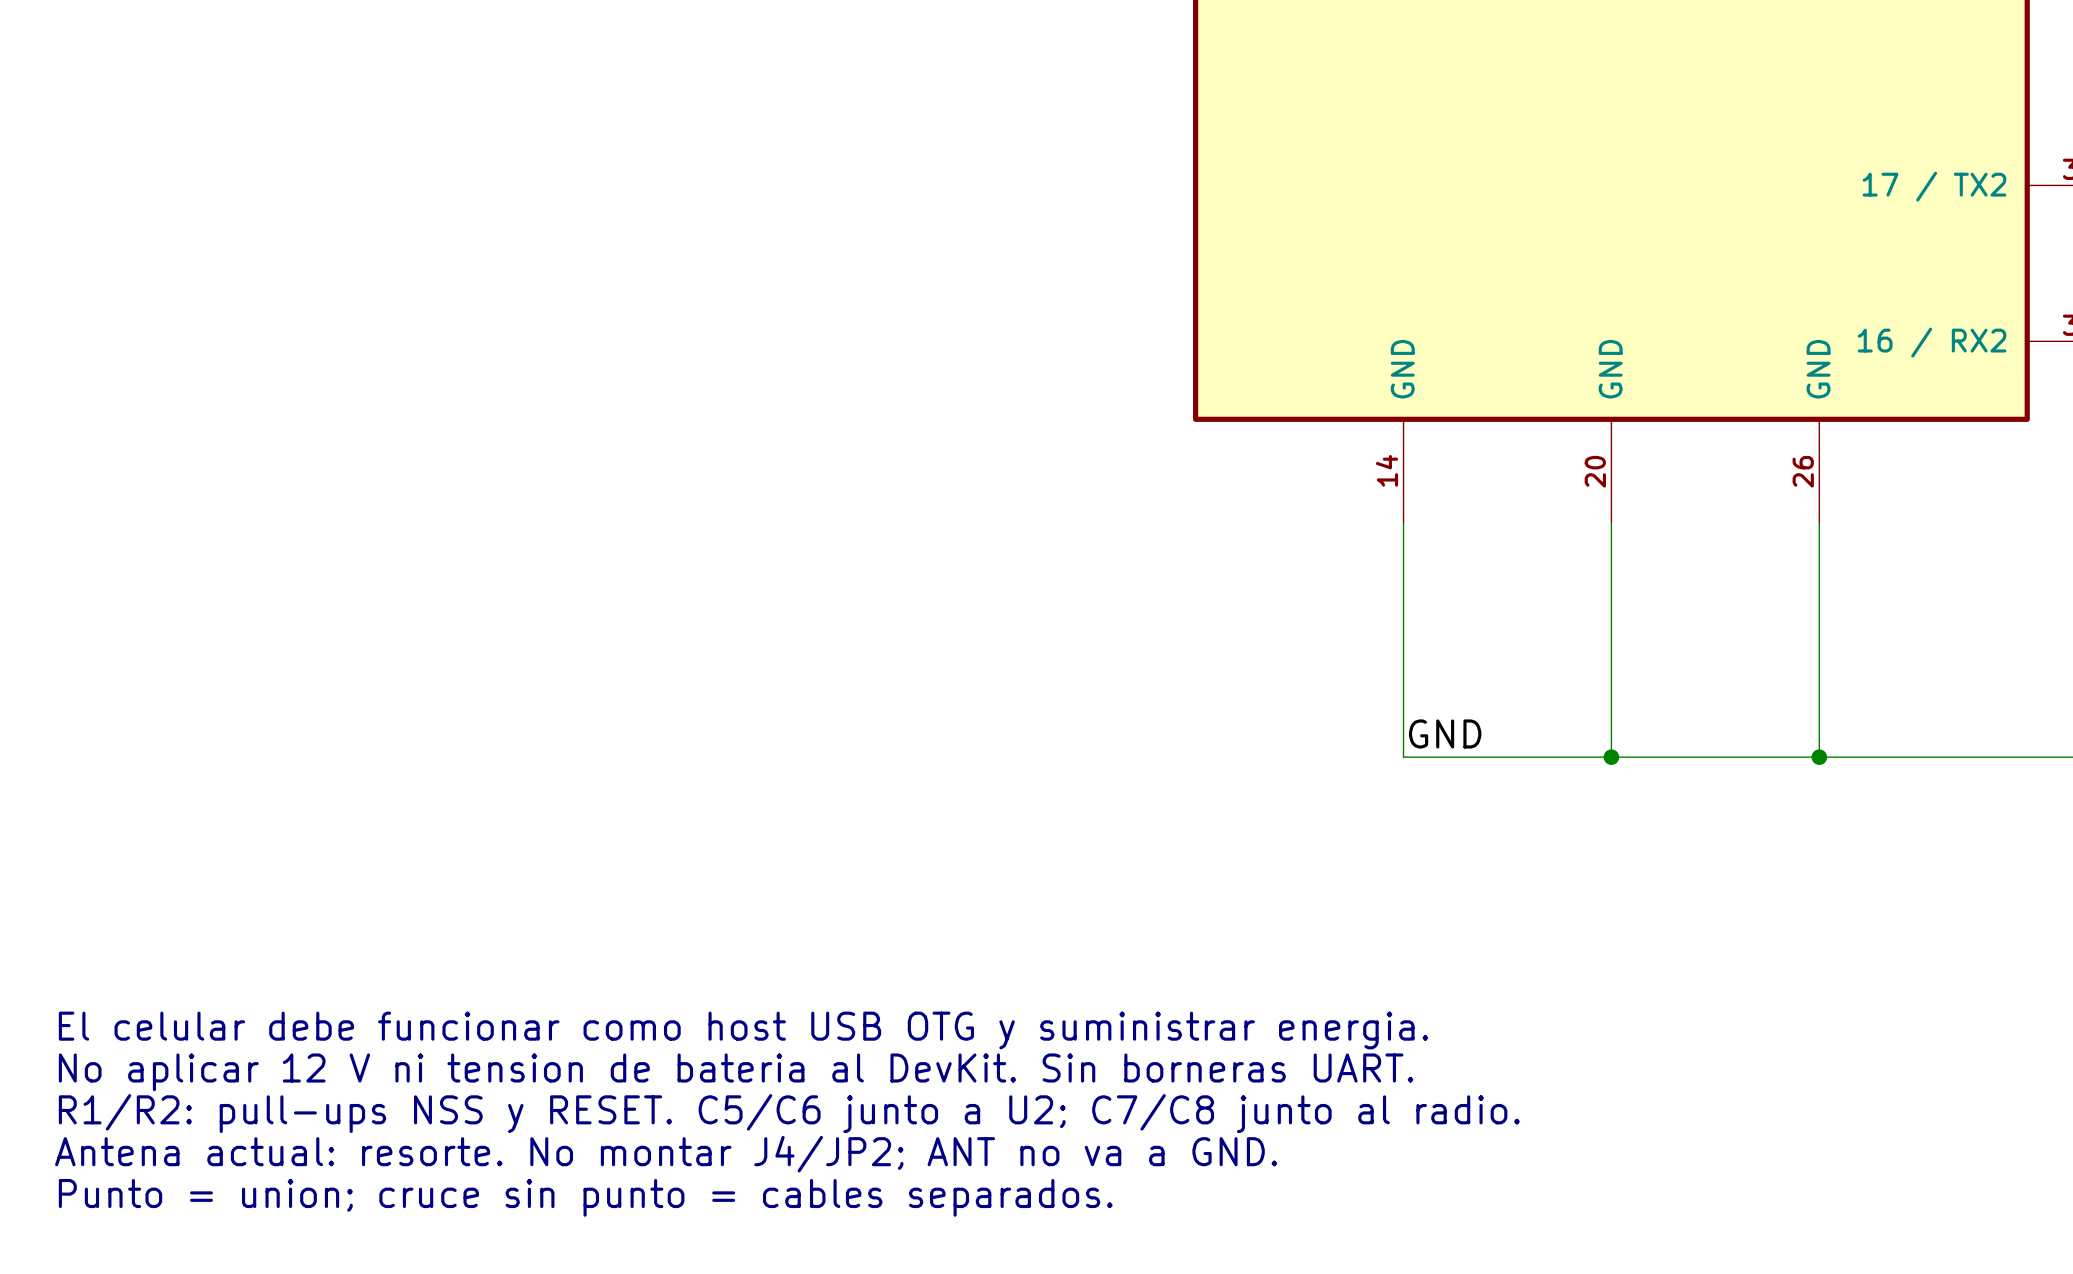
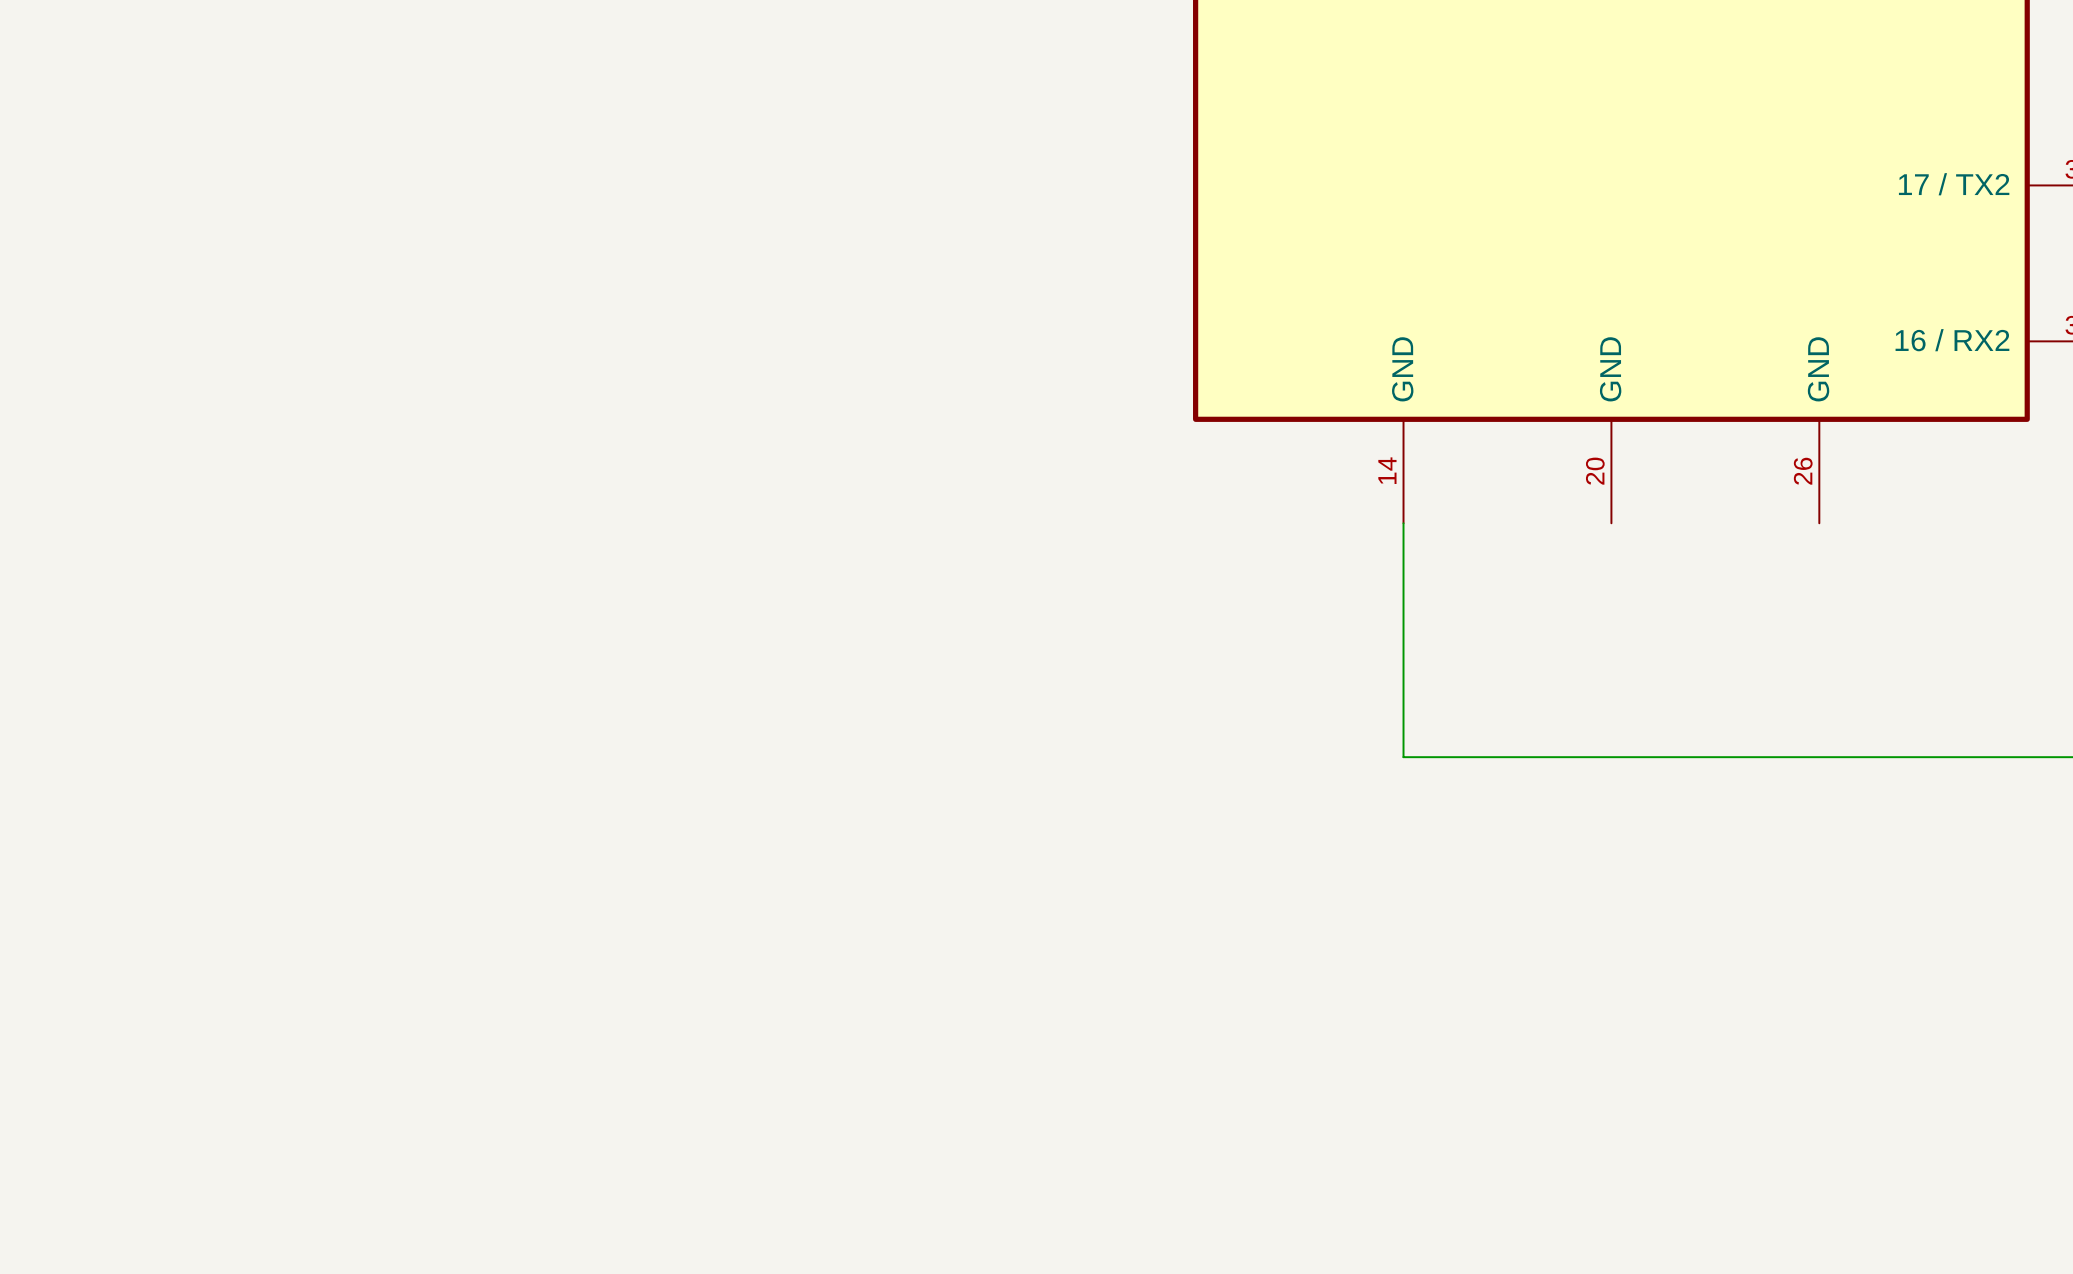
wire: (1611, 523) (1611, 757) -> none
wire: (1819, 523) (1819, 757) -> none
label: GND (1445, 733) -> none
junction: (1611, 757) -> none
junction: (1819, 757) -> none
text: El celular debe funcionar como host USB OTG y suministrar energia. (743, 1030) -> none
text: No aplicar 12 V ni tension de bateria al DevKit. Sin borneras UART. (736, 1072) -> none
text: R1/R2: pull-ups NSS y RESET. C5/C6 junto a U2; C7/C8 junto al radio. (789, 1113) -> none
text: Antena actual: resorte. No montar J4/JP2; ANT no va a GND. (666, 1154) -> none
text: Punto = union; cruce sin punto = cables separados. (585, 1197) -> none

